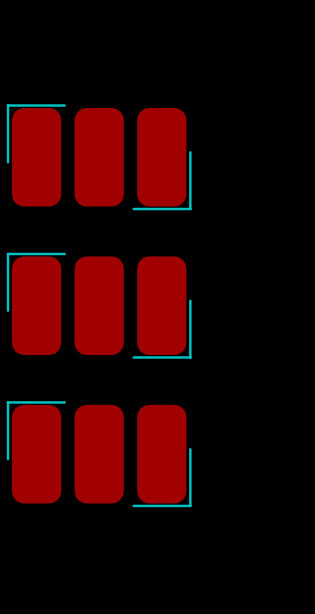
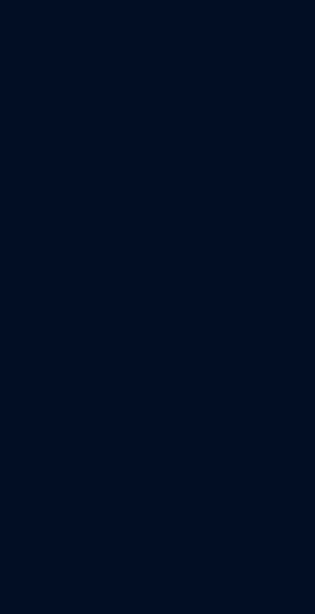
part: (99, 157) -> none
part: (99, 305) -> none
part: (99, 454) -> none

